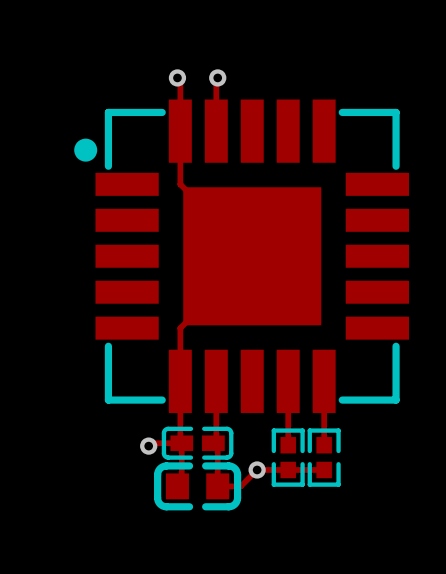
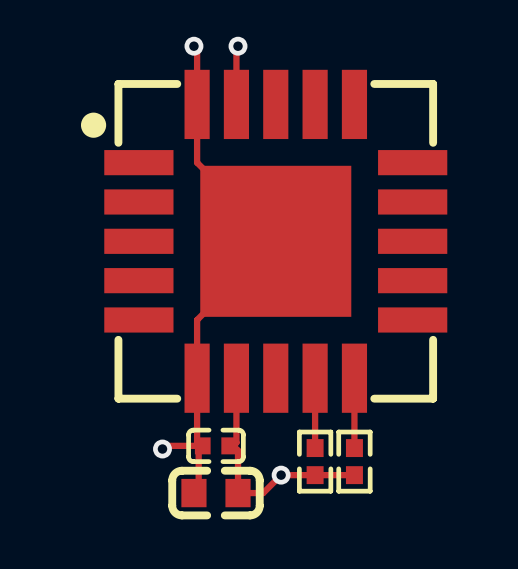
part footprint: [161, 426, 234, 460] -> [186, 427, 246, 464]

